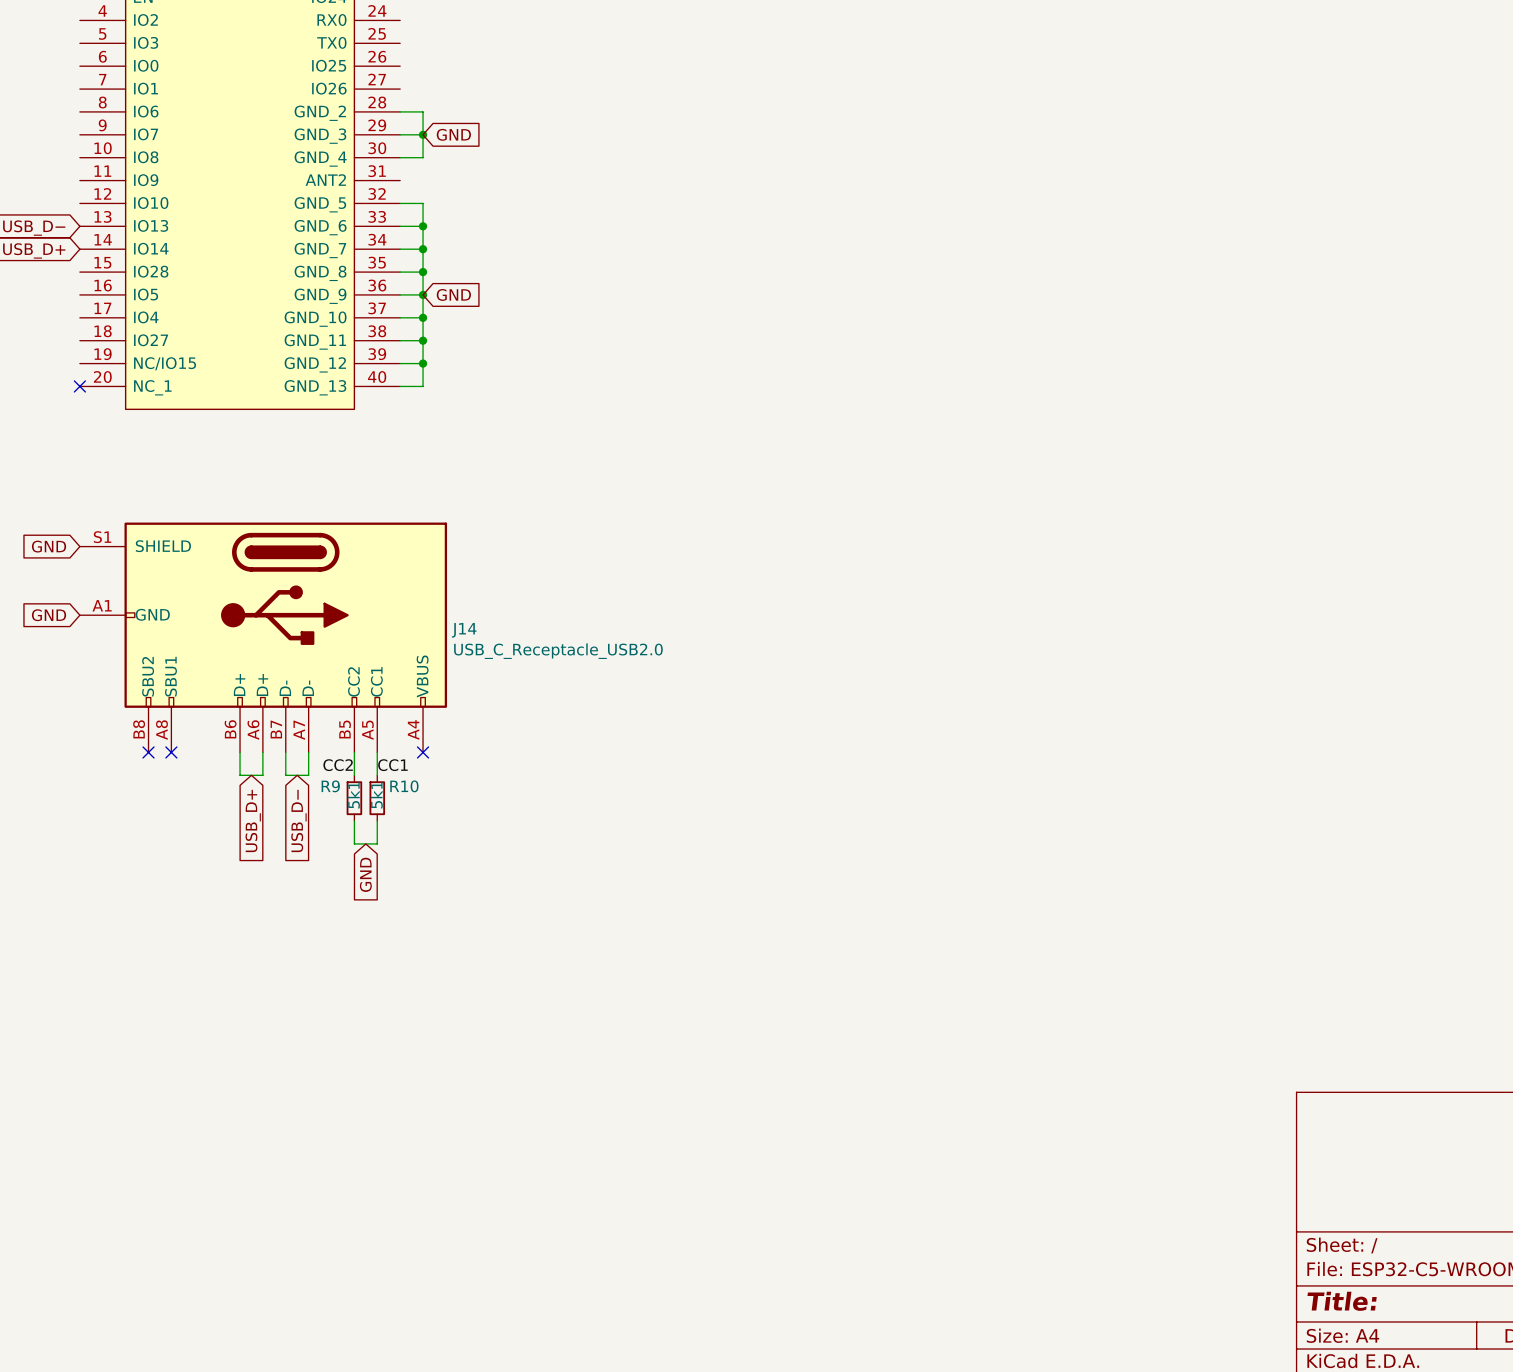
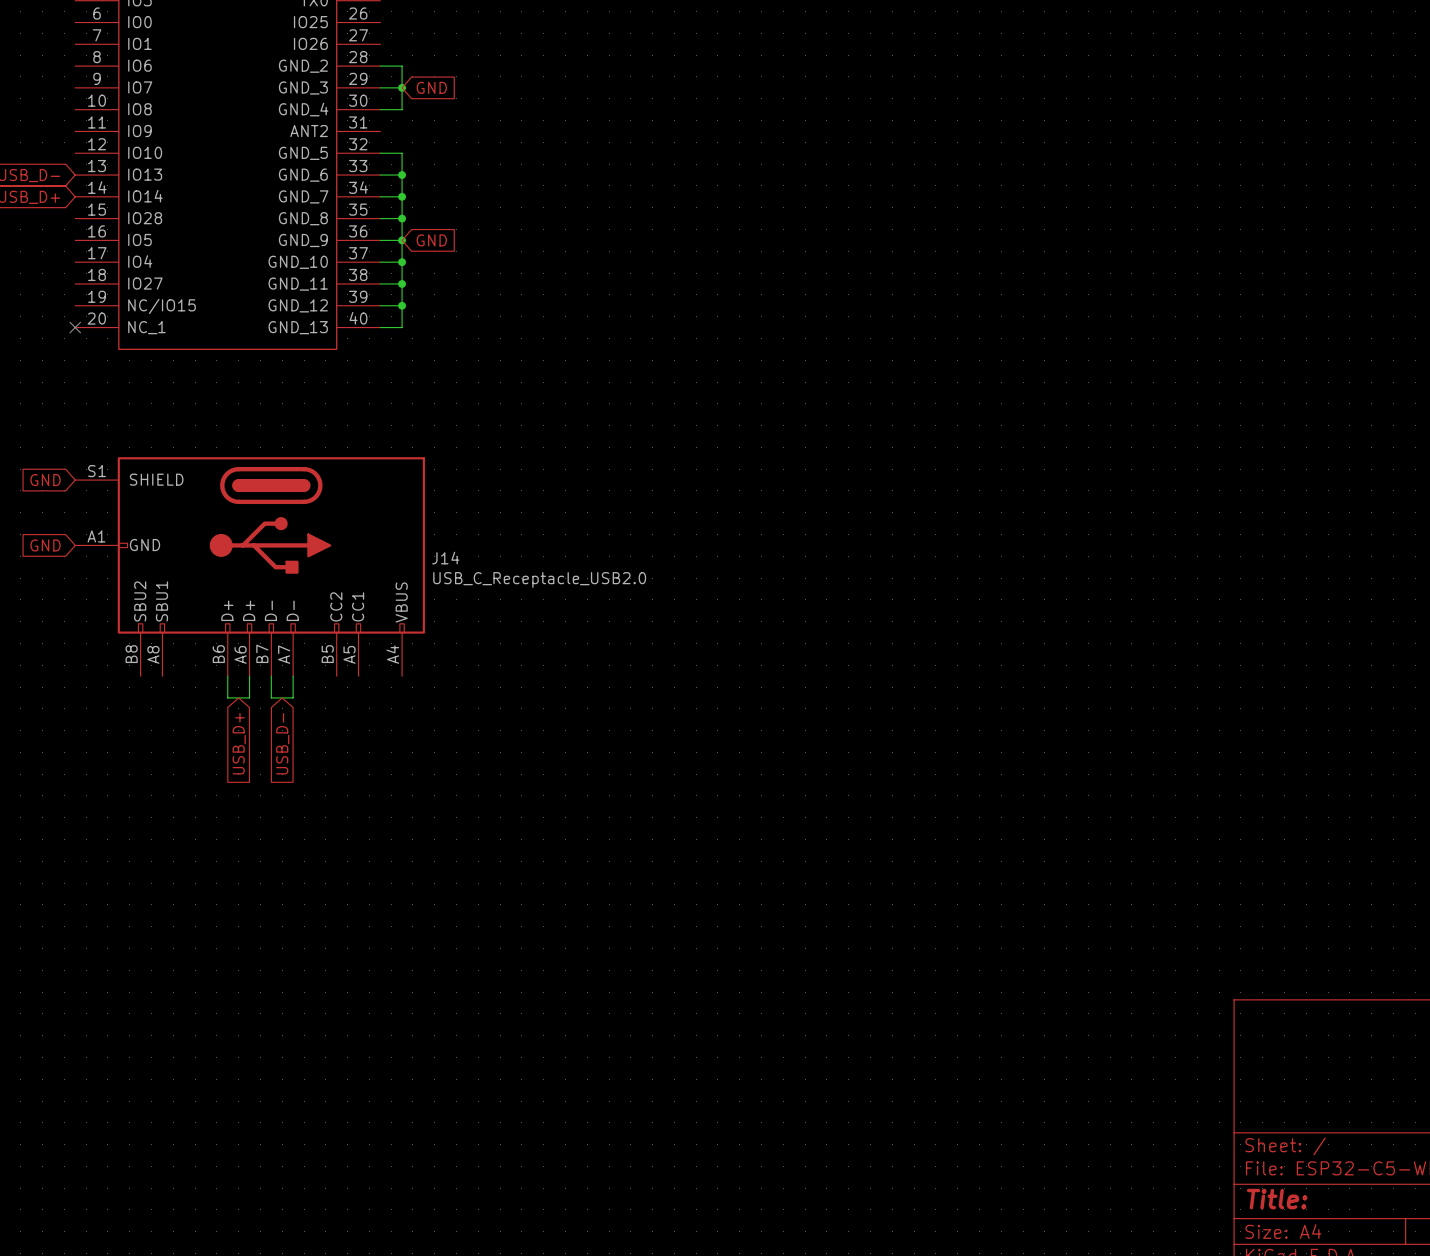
no-connect mark: (148, 752) -> none
no-connect mark: (171, 752) -> none
wire: (354, 752) (354, 775) -> none
wire: (377, 752) (377, 775) -> none
no-connect mark: (423, 752) -> none
label: CC2 (338, 765) -> none
label: CC1 (392, 765) -> none
R9: 5k1 (354, 798) -> none
R10: 5k1 (377, 798) -> none
wire: (354, 821) (354, 843) (377, 843) (377, 821) -> none
global label: GND (365, 874) -> none

